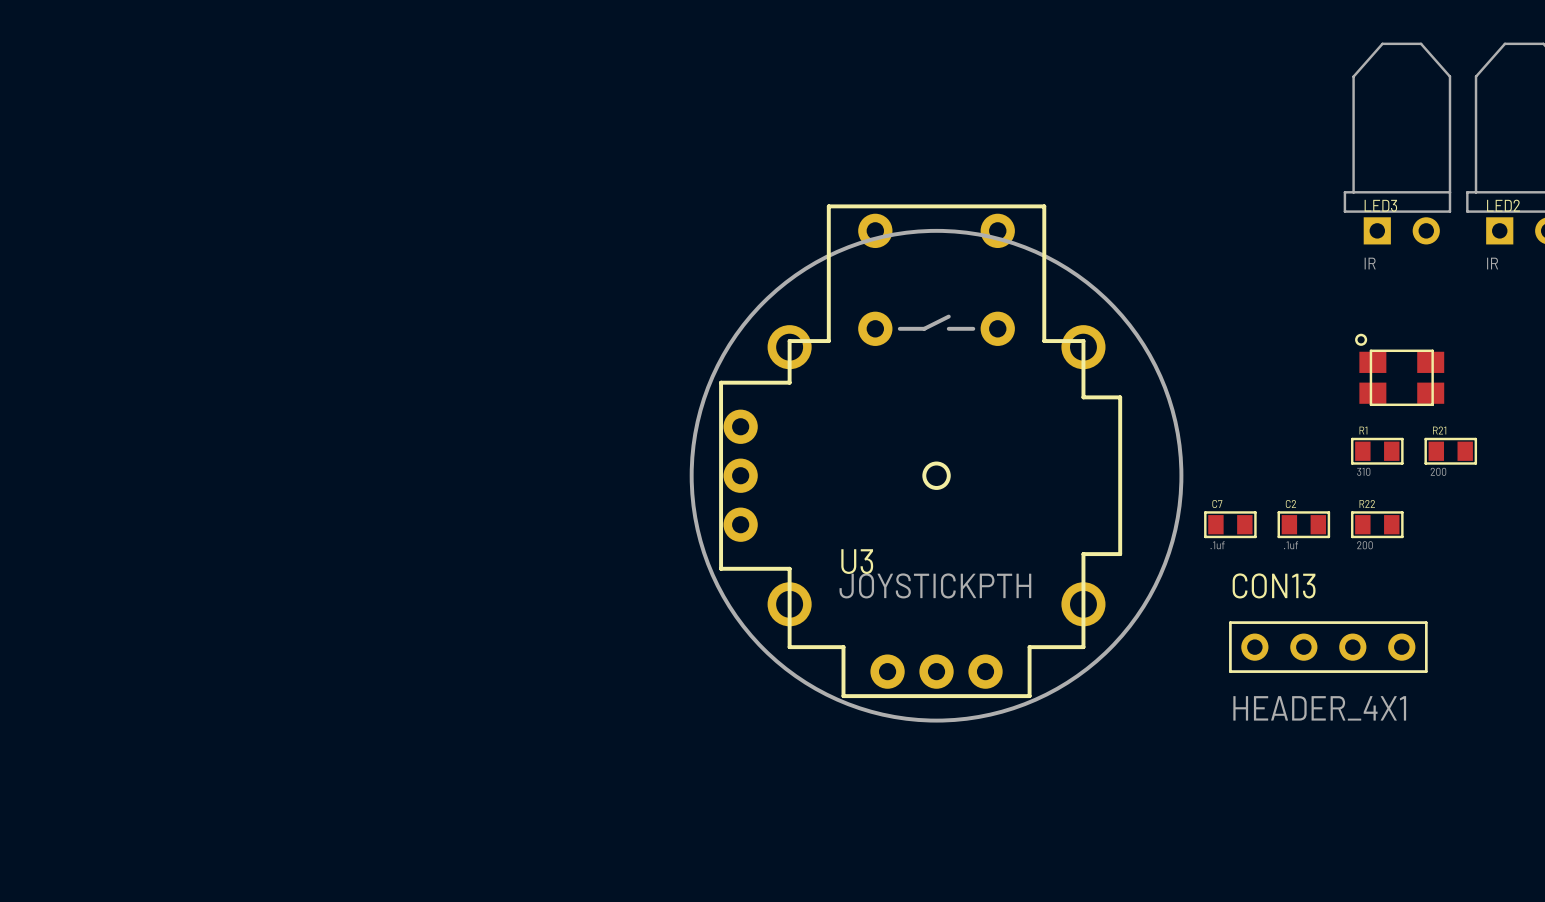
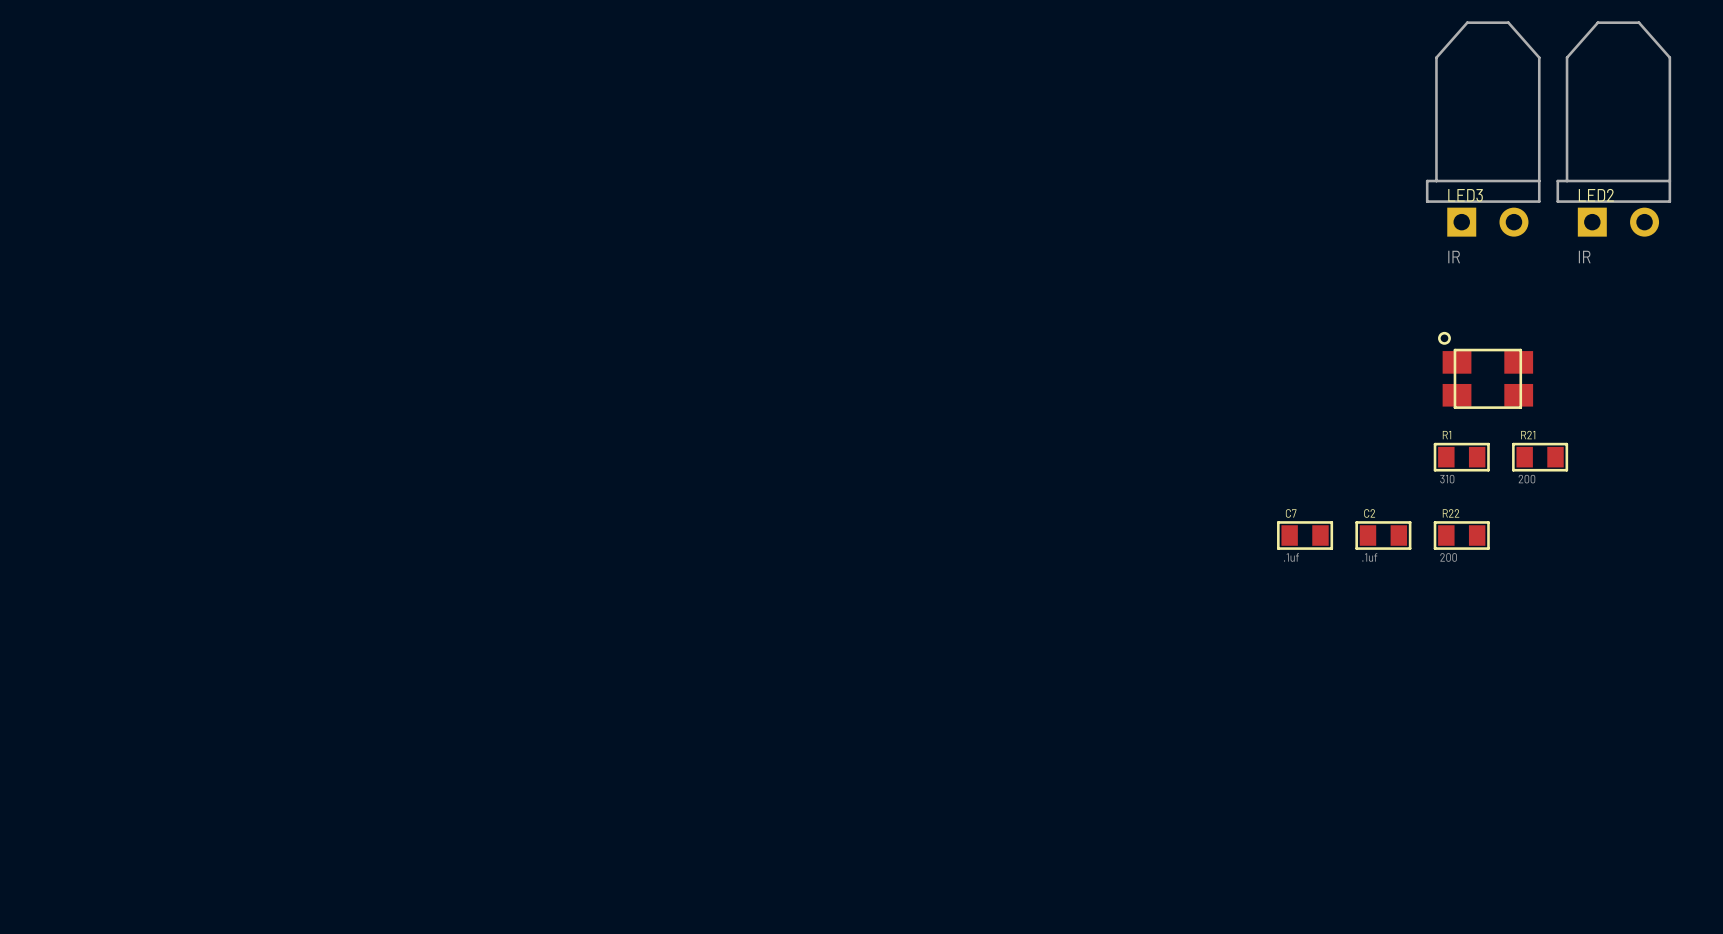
U3: JOYSTICKPTH (936, 463) -> none
CON13: HEADER_4X1 (1328, 647) -> none

